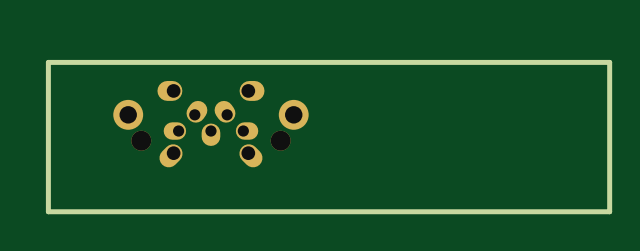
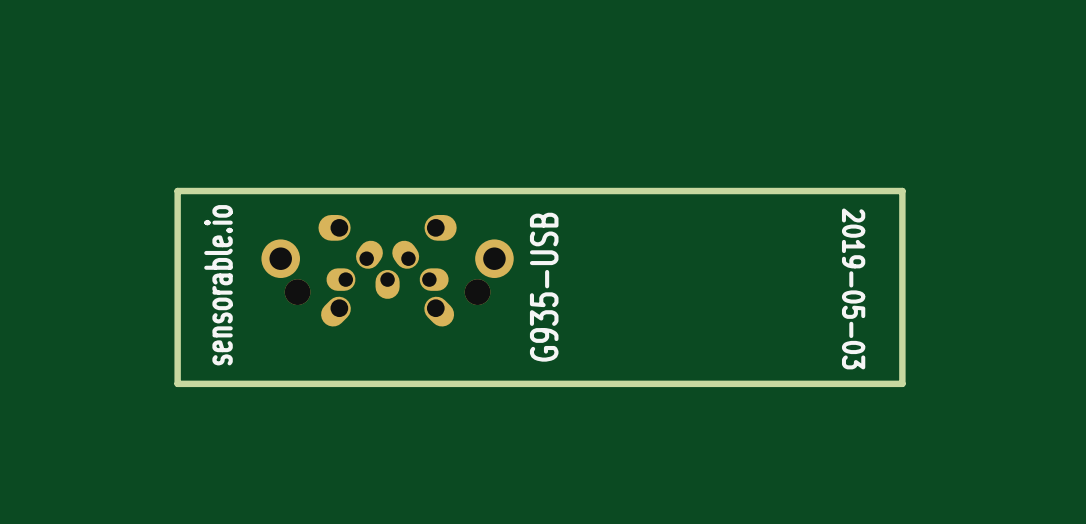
text: none -> sensorable.io (218, 285)
text: none -> G935-USB (544, 287)
text: none -> 2019-05-03 (853, 288)

